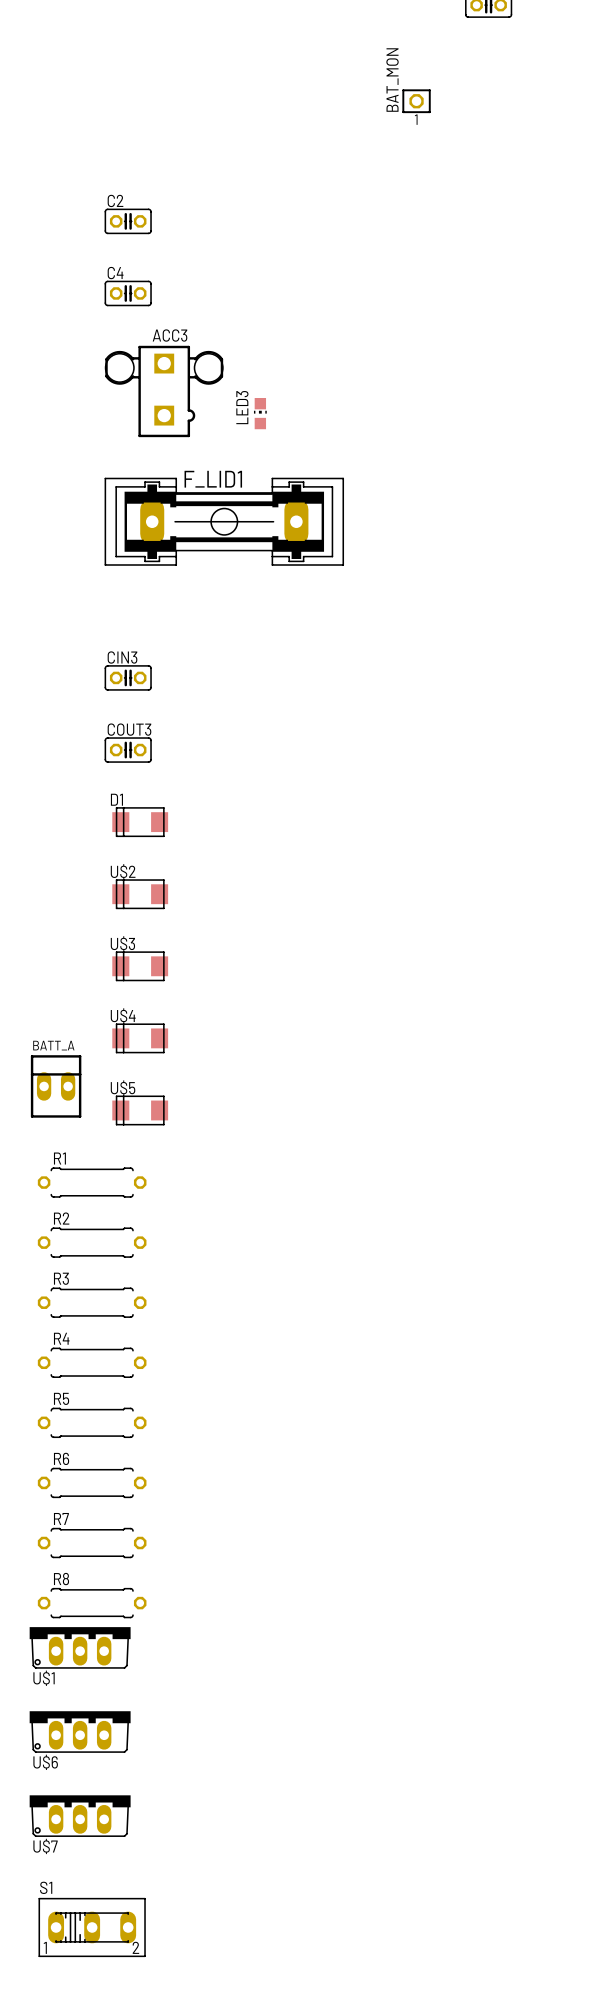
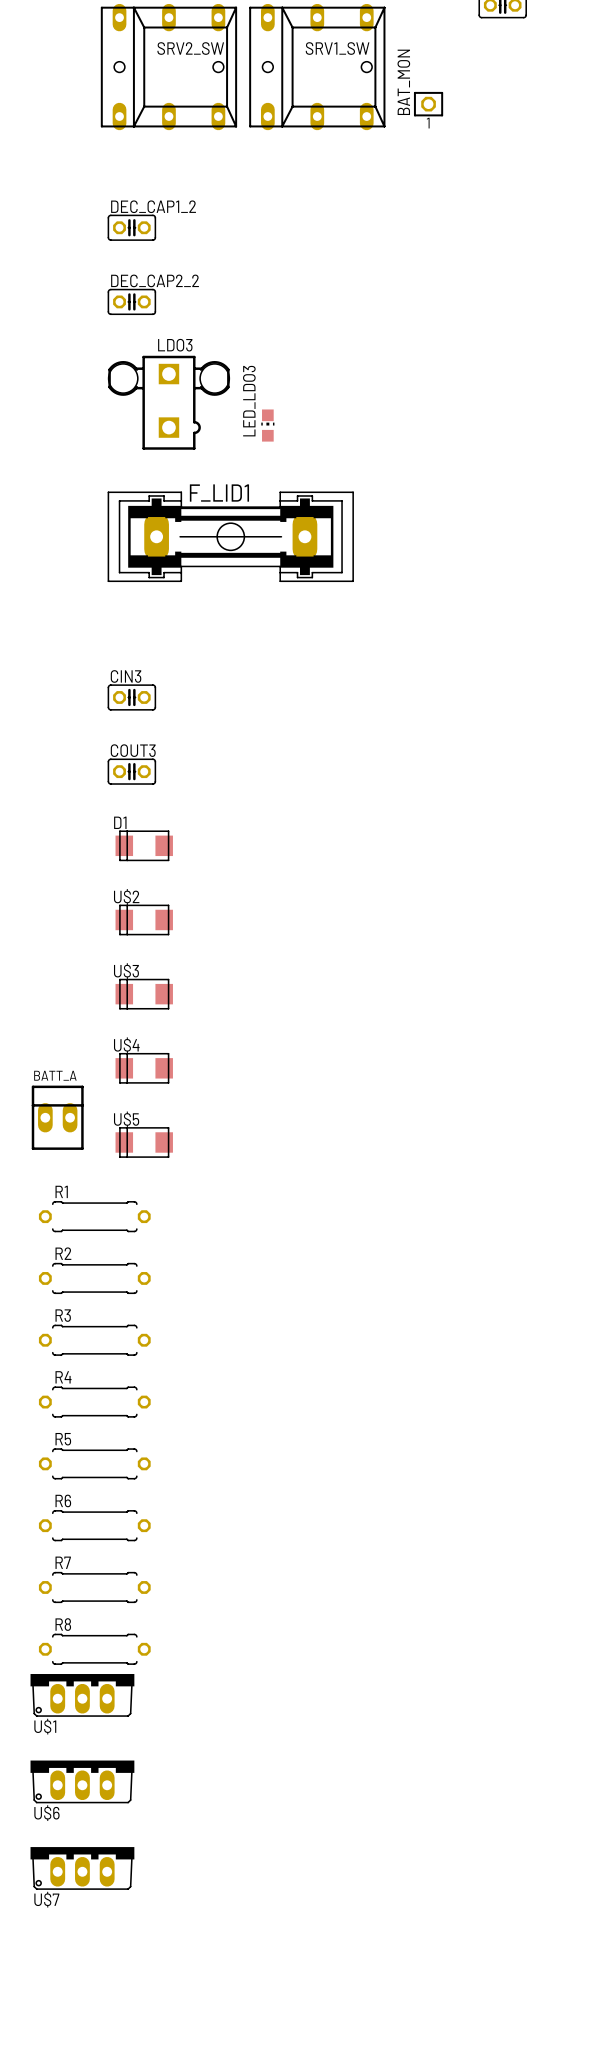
SRV2_SW: none -> (168, 67)
SRV1_SW: none -> (317, 67)
C2 name: C2 (115, 200) -> DEC_CAP1_2 (153, 206)
C4 name: C4 (115, 273) -> DEC_CAP2_2 (155, 280)
ACC3 name: ACC3 (170, 335) -> LDO3 (175, 345)
LED3 name: LED3 (242, 407) -> LED_LDO3 (249, 401)
S1: (92, 1927) -> none

